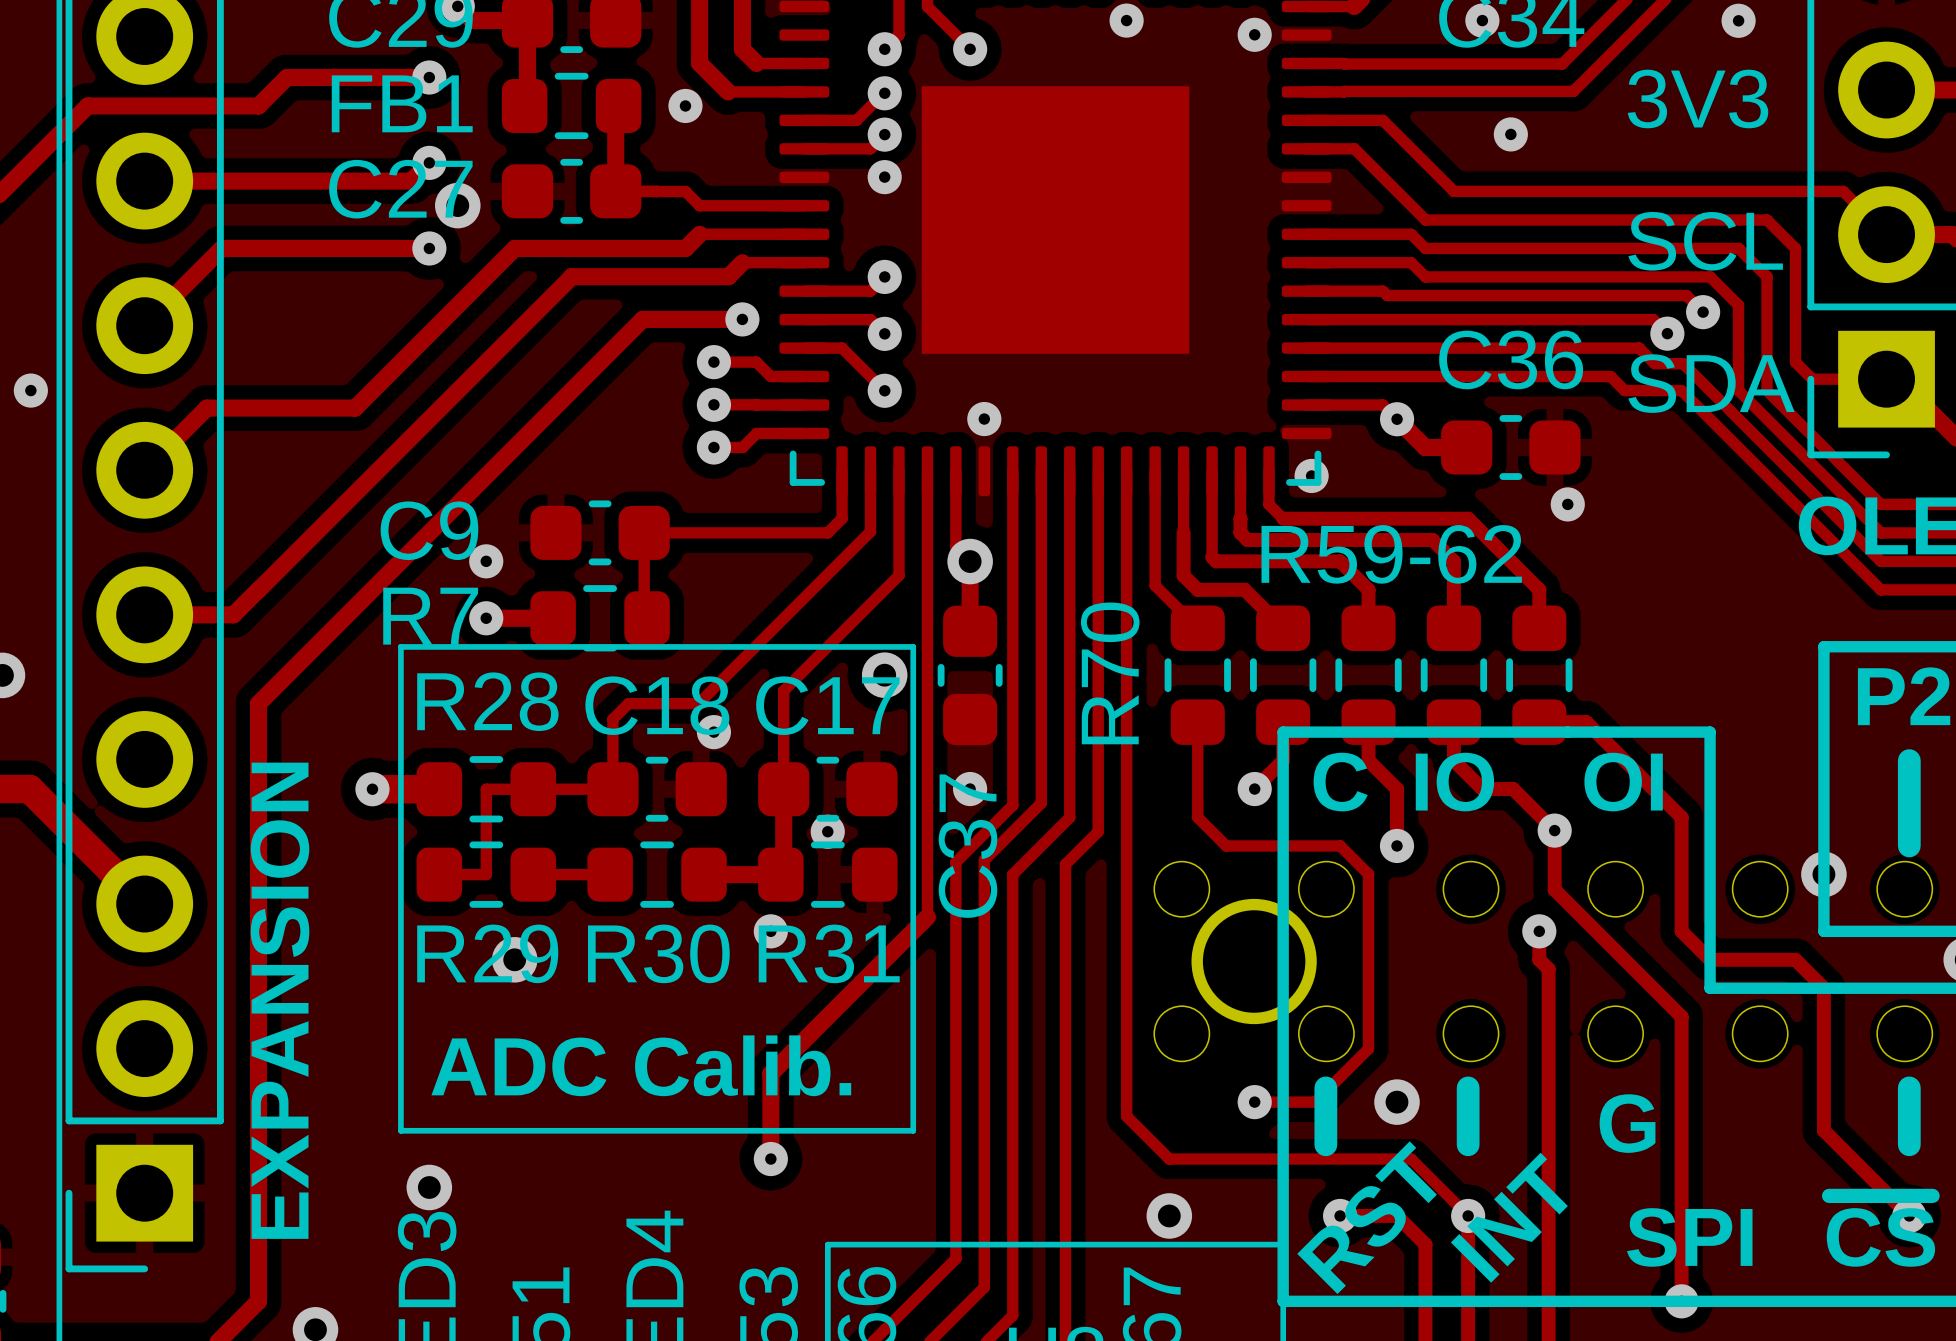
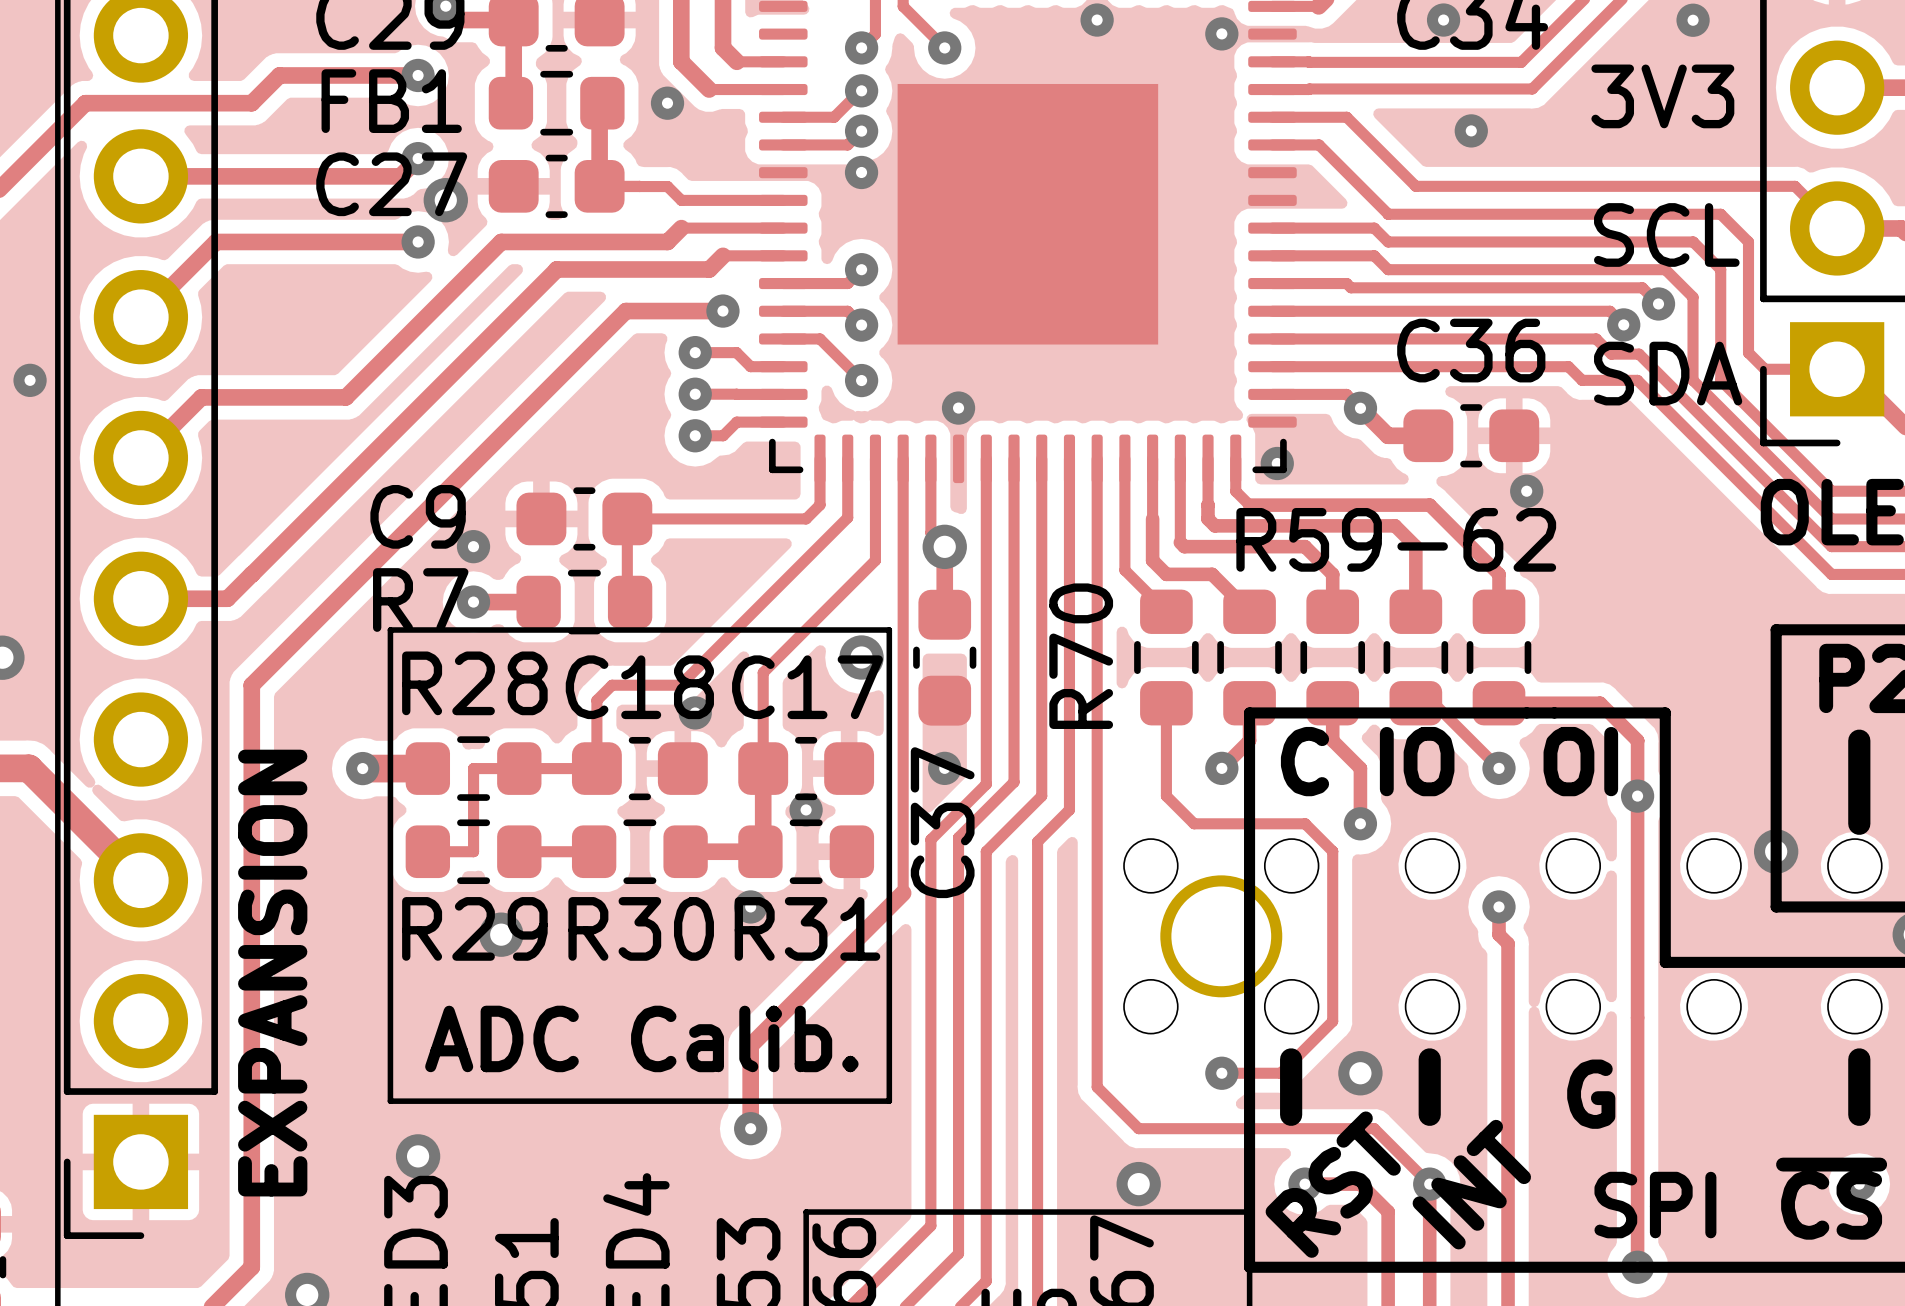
track: (1453, 722) (1453, 760) (1482, 789) (1513, 789) (1554, 830) (1554, 889) (1681, 1016) -> (1415, 703) (1433, 703) (1499, 768)
track: (1586, 722) (1681, 817) -> (1544, 703) (1600, 703) (1637, 740) (1637, 796)
via: none -> (1637, 796)
via position: (1554, 830) -> (1499, 768)
track: (1681, 931) (1710, 959) (1795, 959) (1823, 988) (1823, 1130) (1909, 1215) -> (1637, 906) (1637, 990)

